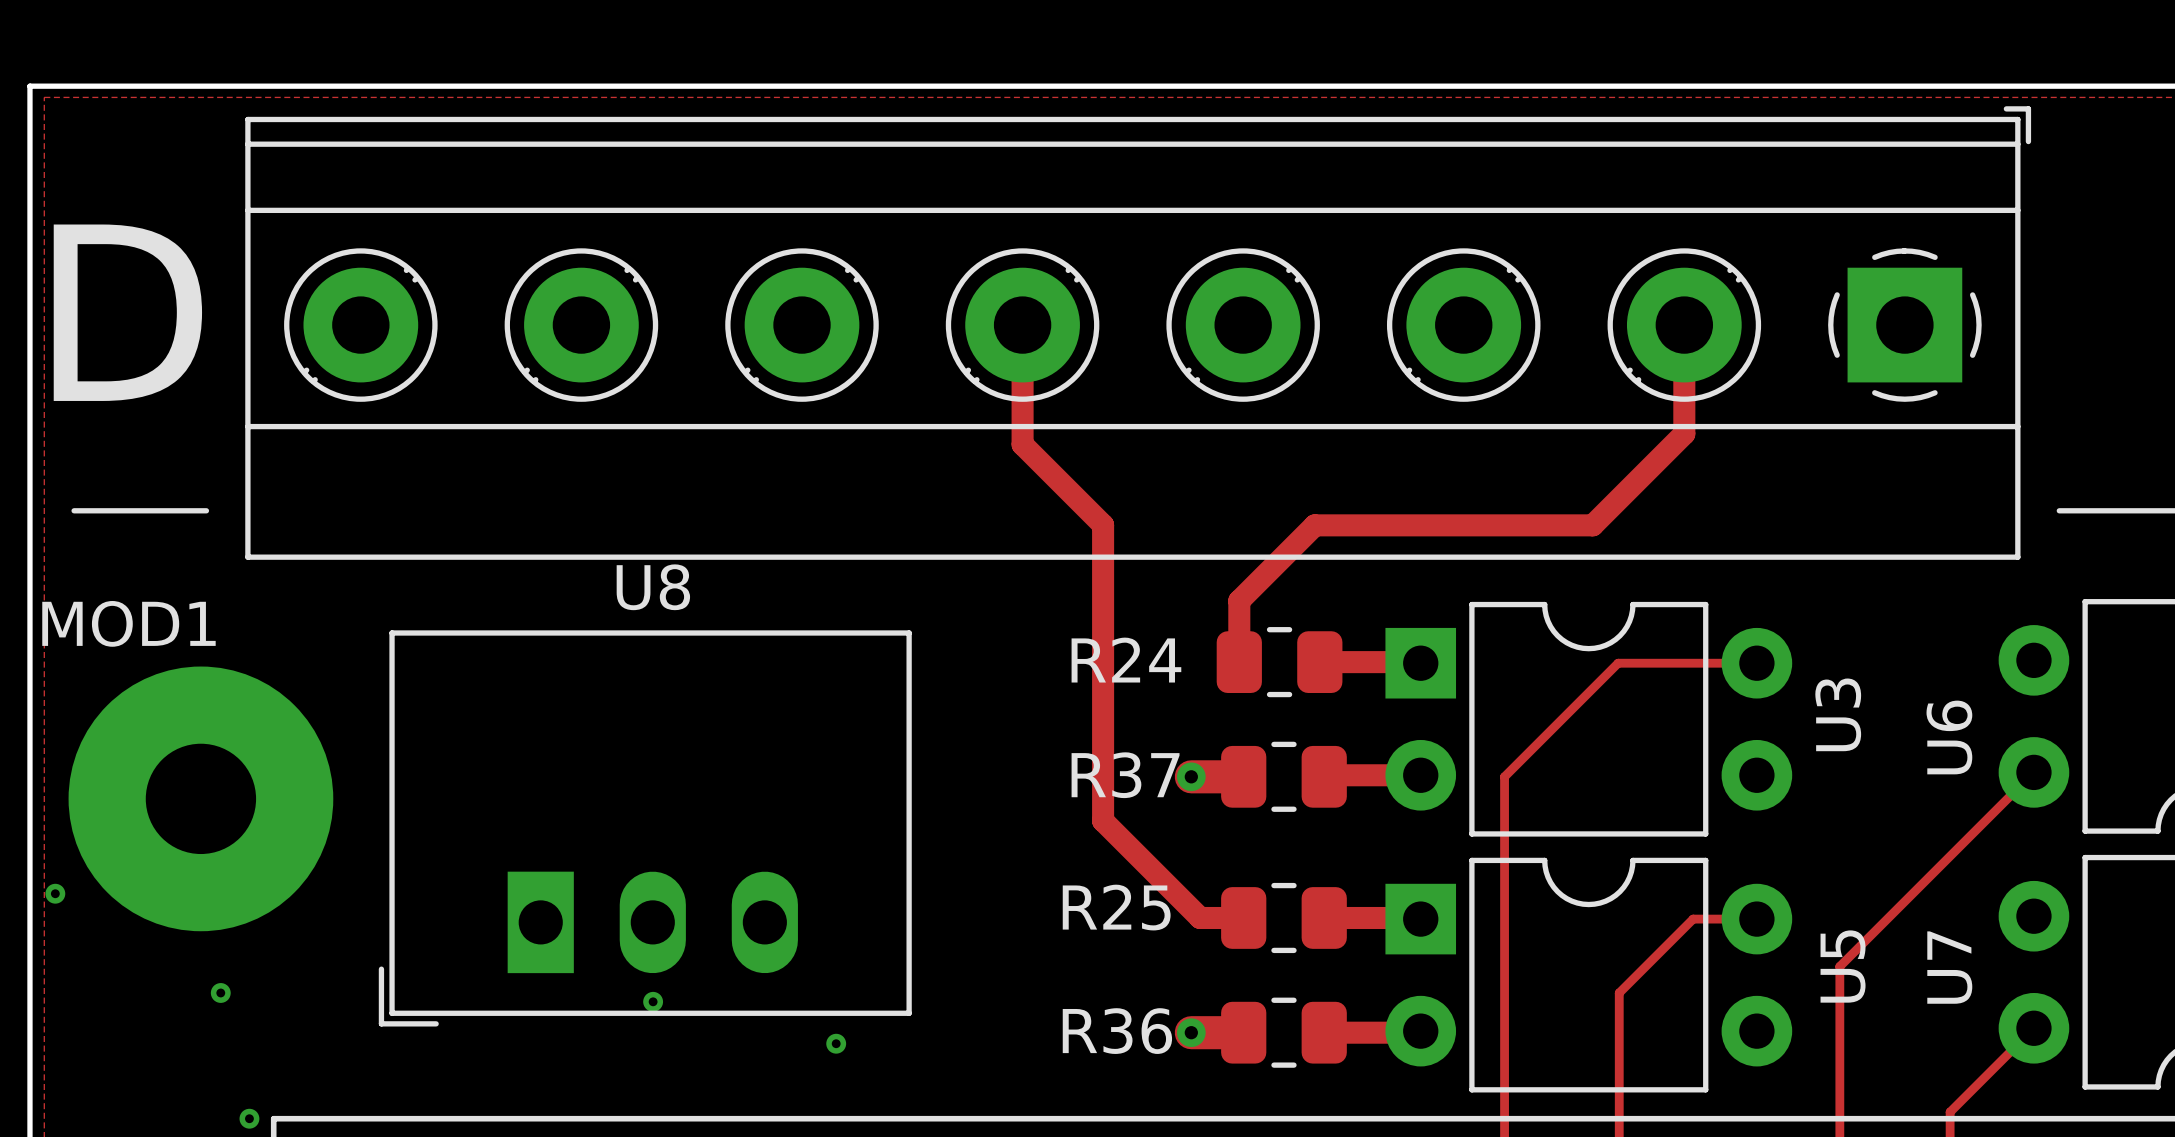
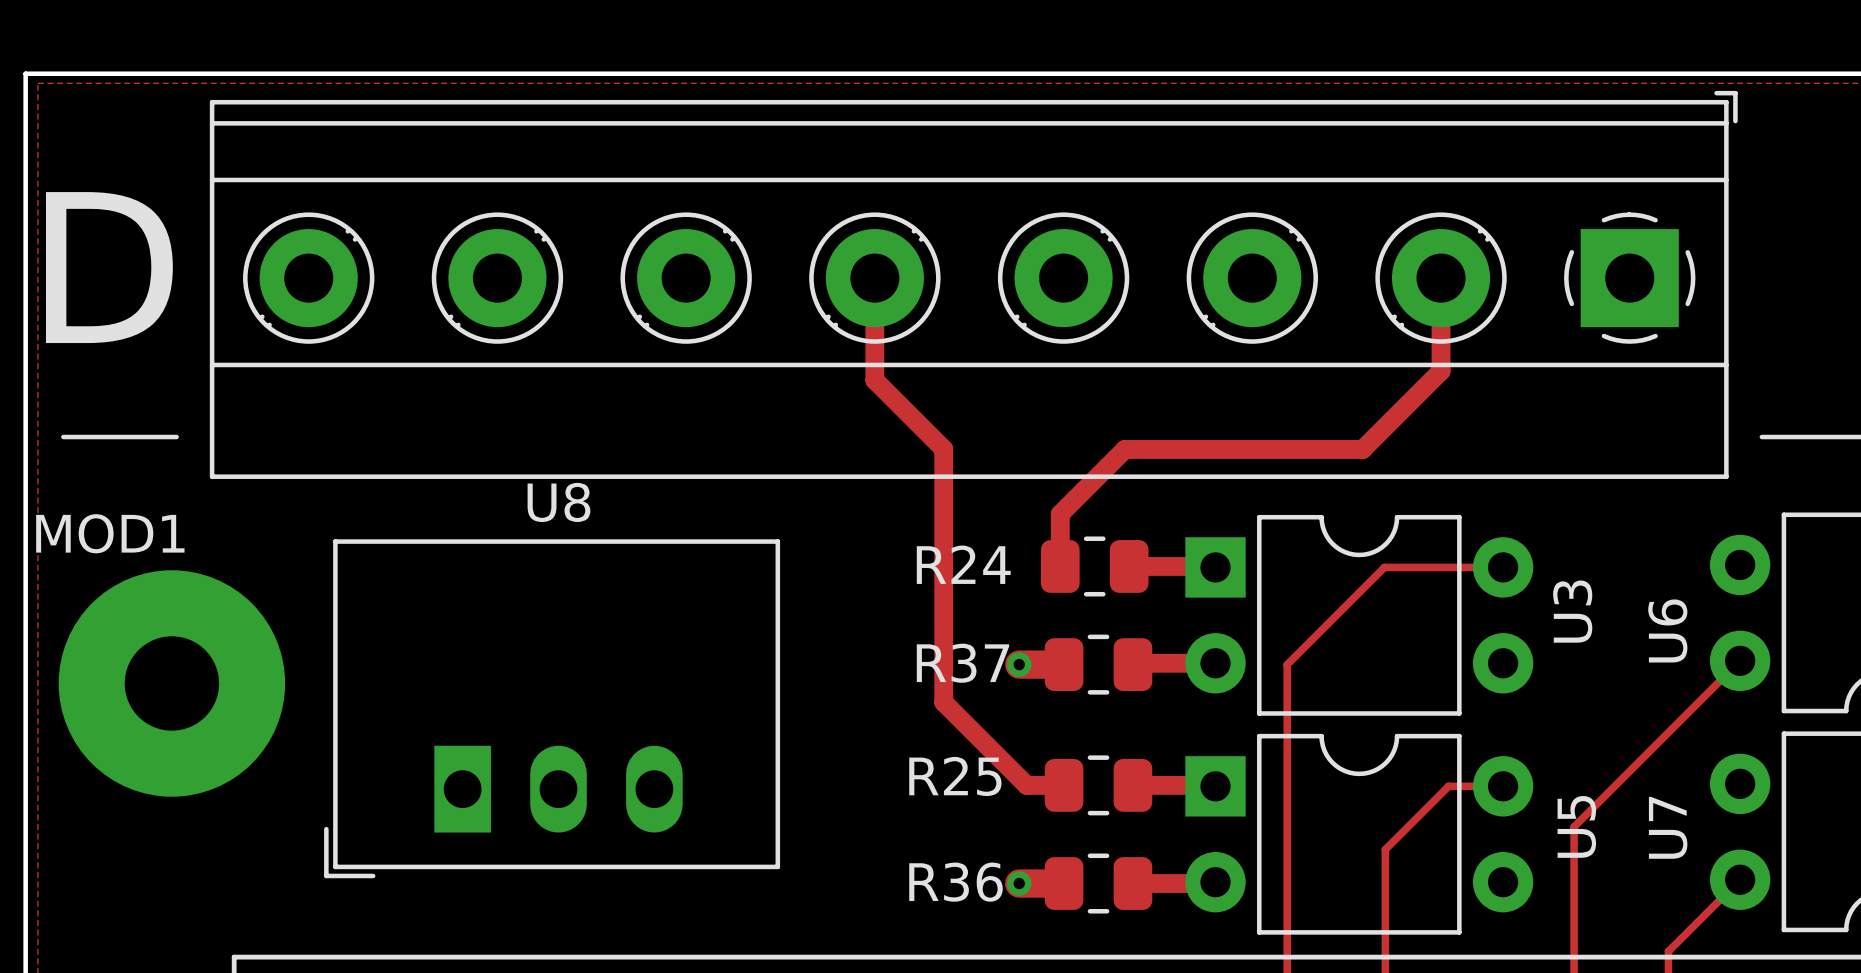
via: (55, 893) -> none
via: (220, 992) -> none
via: (653, 1001) -> none
via: (836, 1043) -> none
via: (249, 1118) -> none

